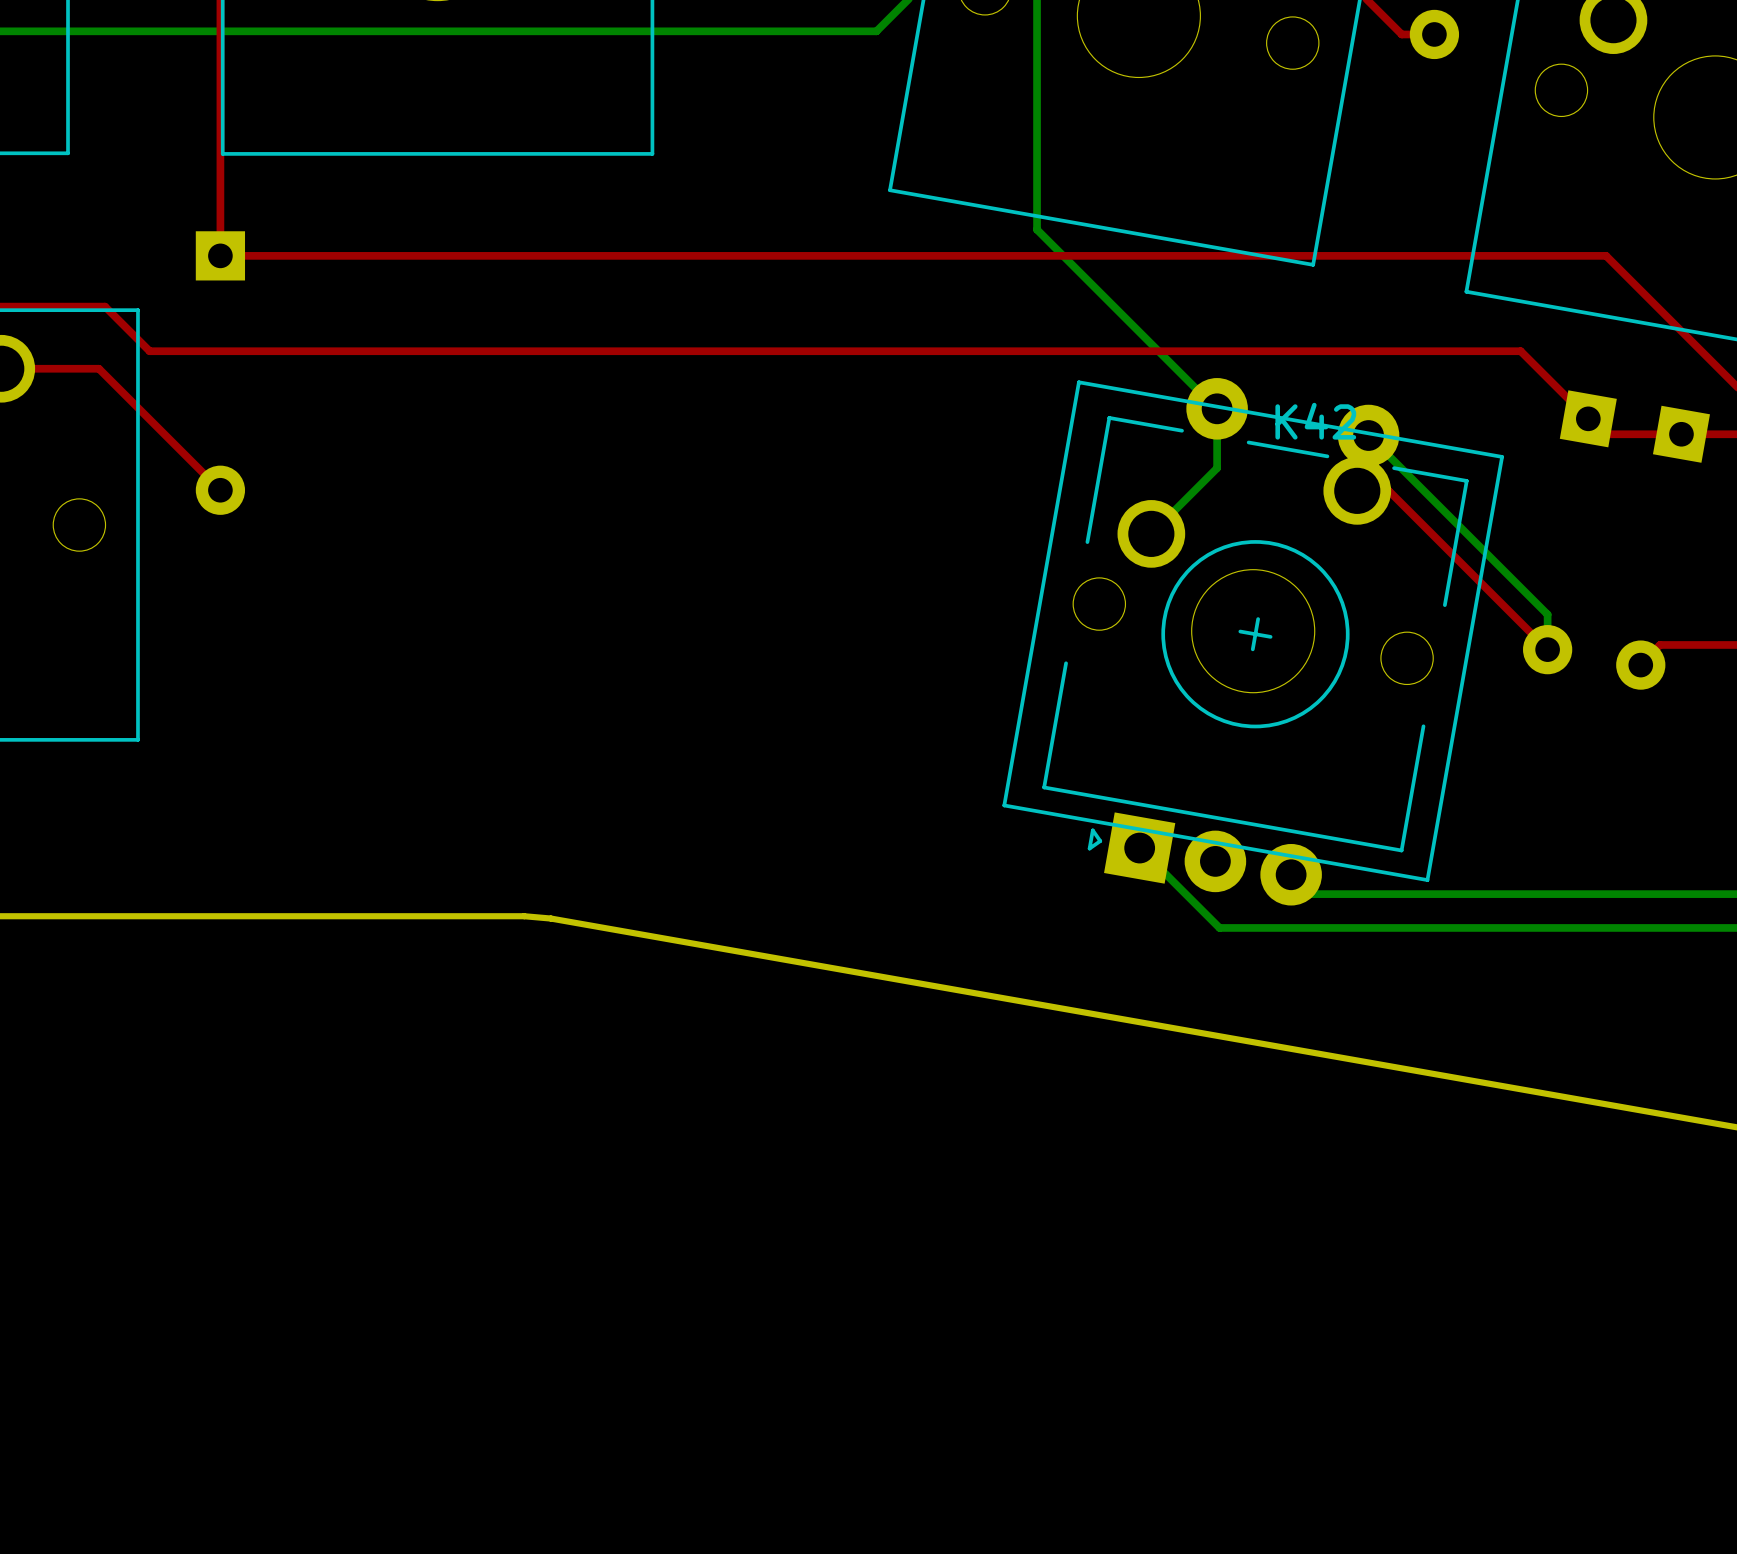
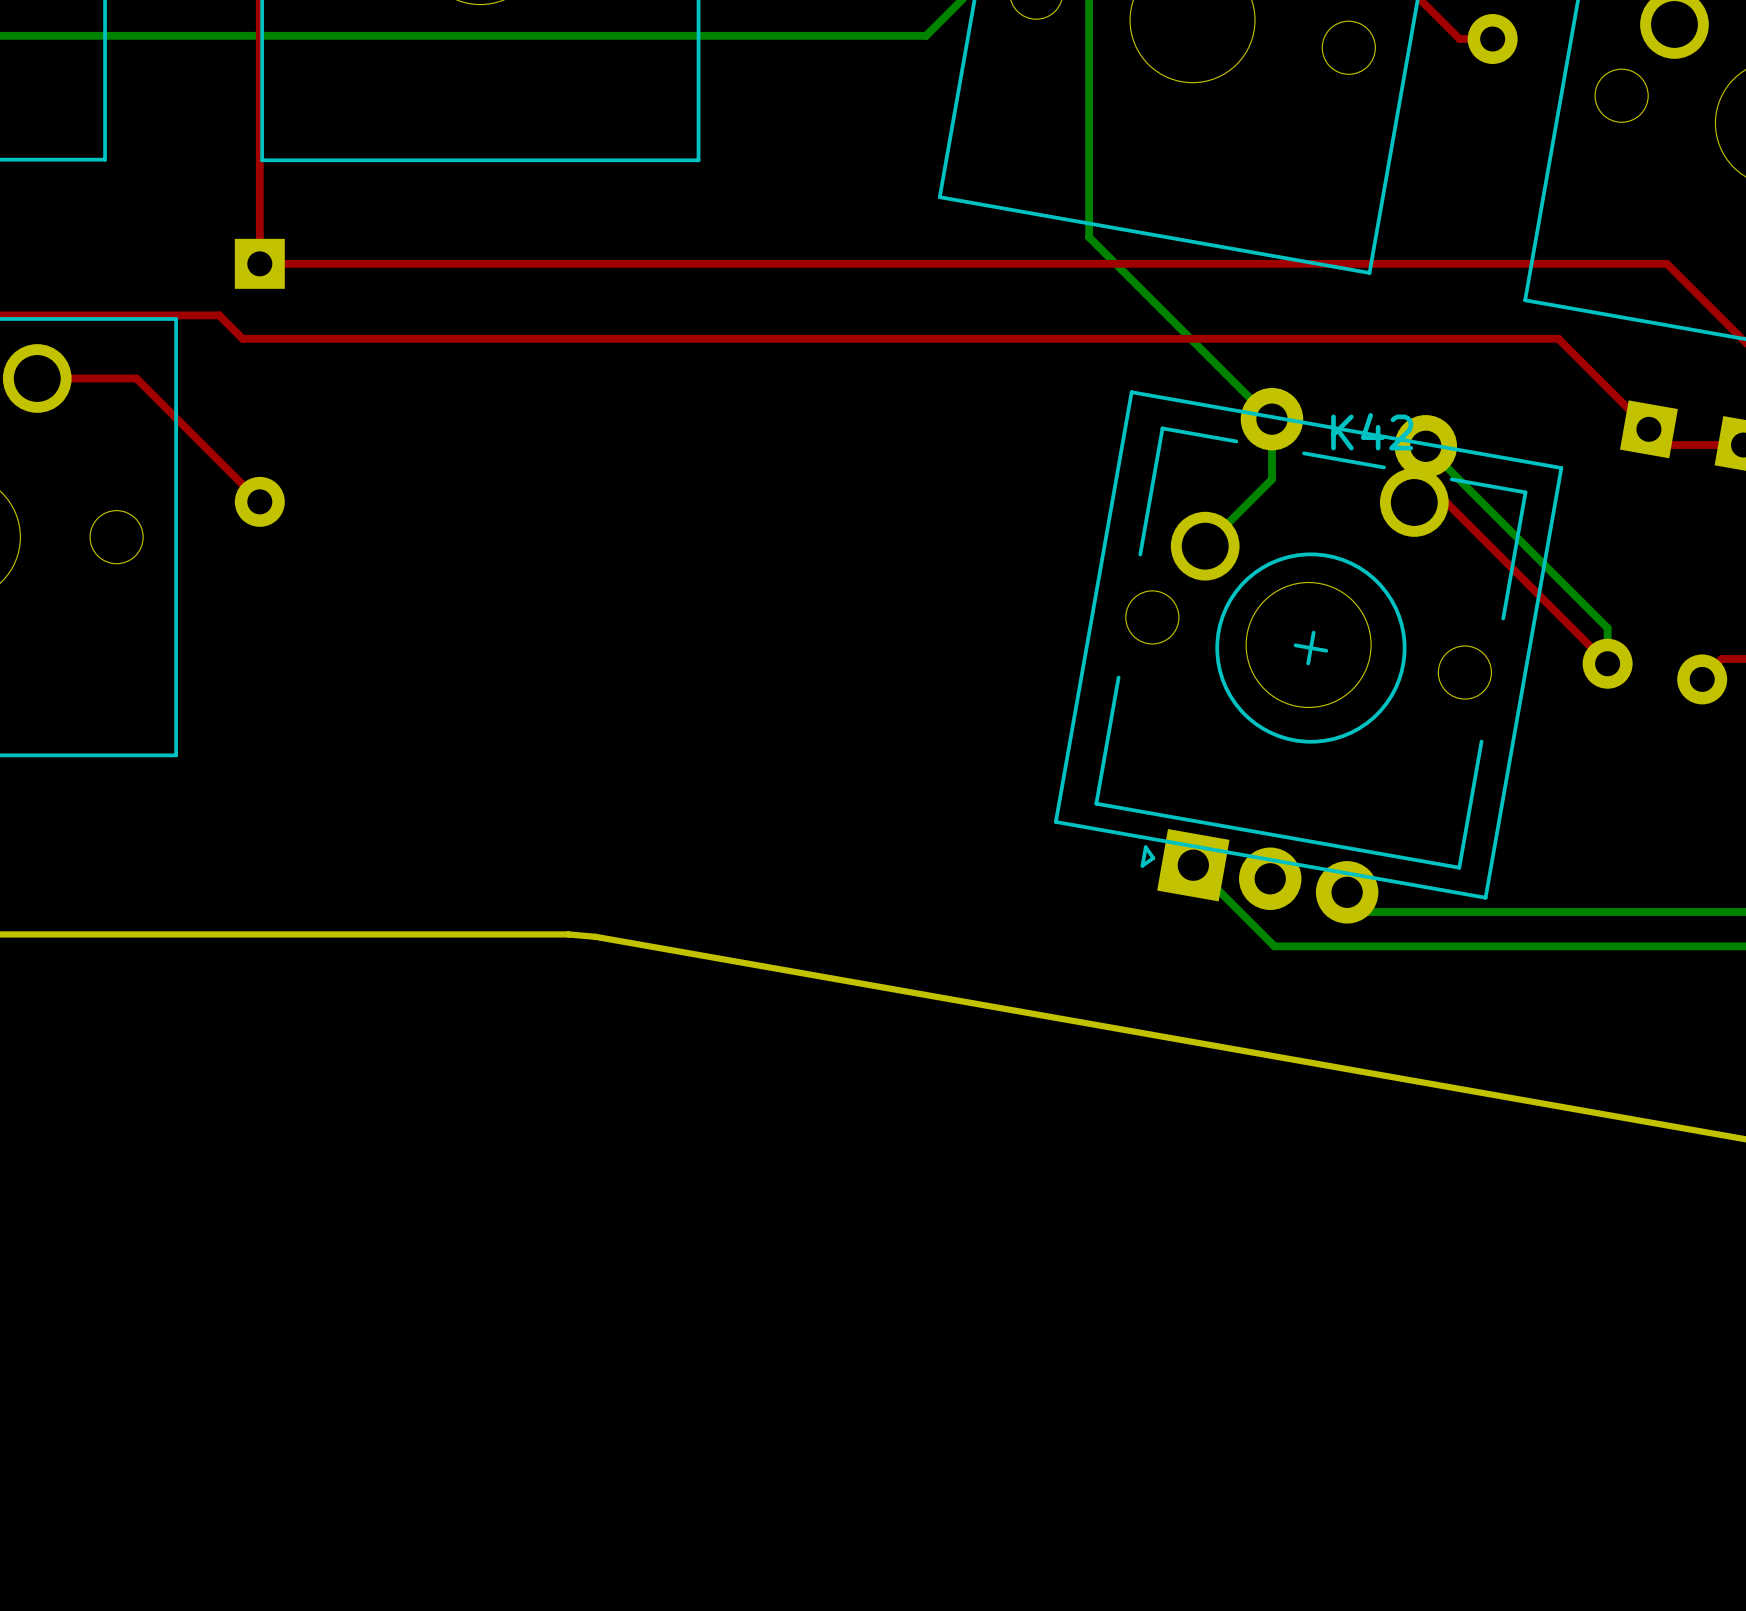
top track: (105, 306) (149, 351) (1520, 351) -> (142, 315) (219, 315) (242, 338) (1558, 338) (1580, 360)

